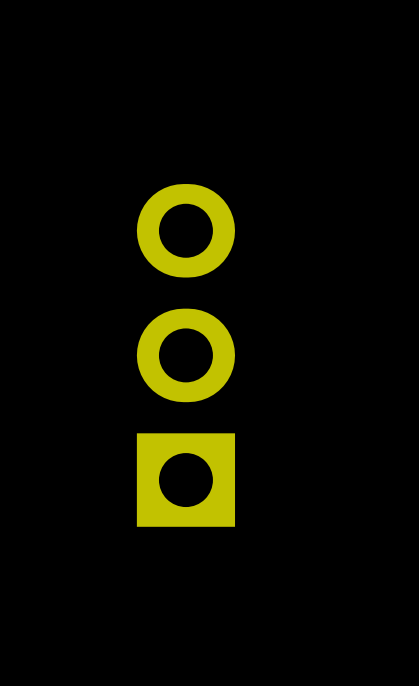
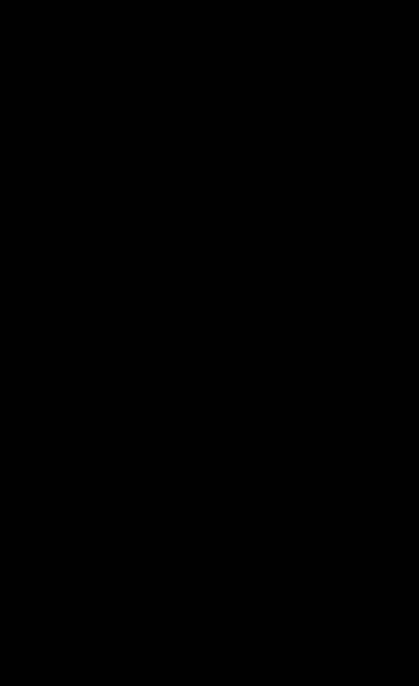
part: (185, 355) -> none

